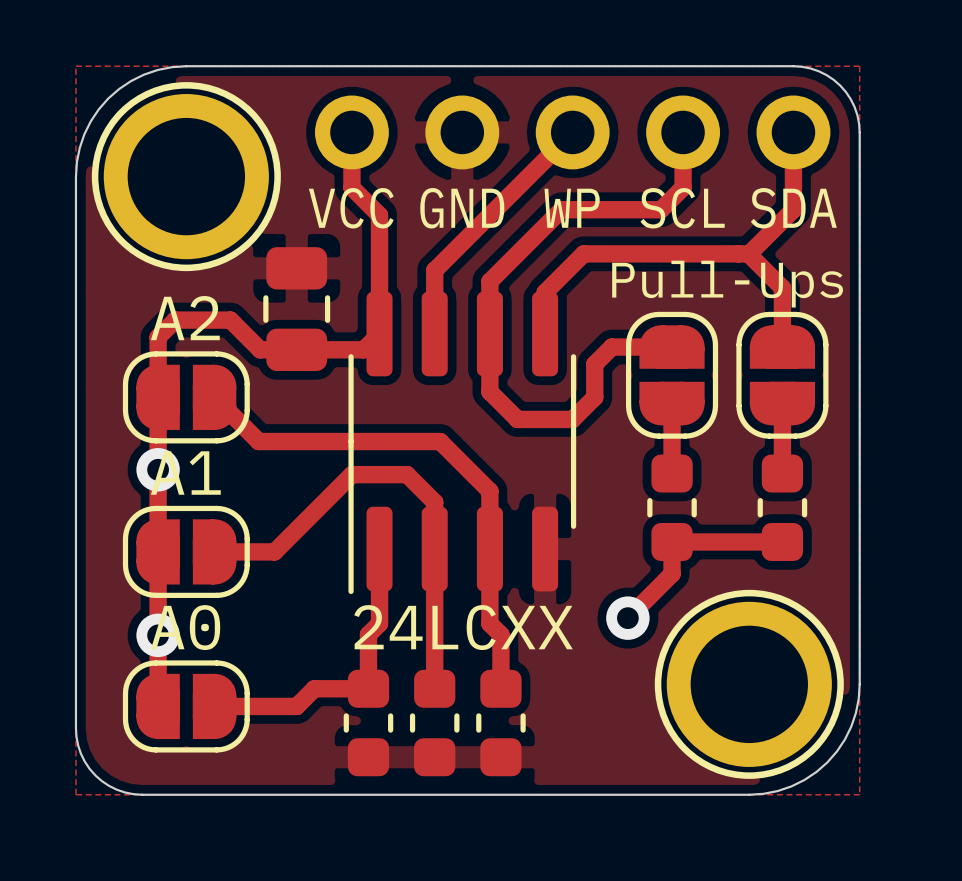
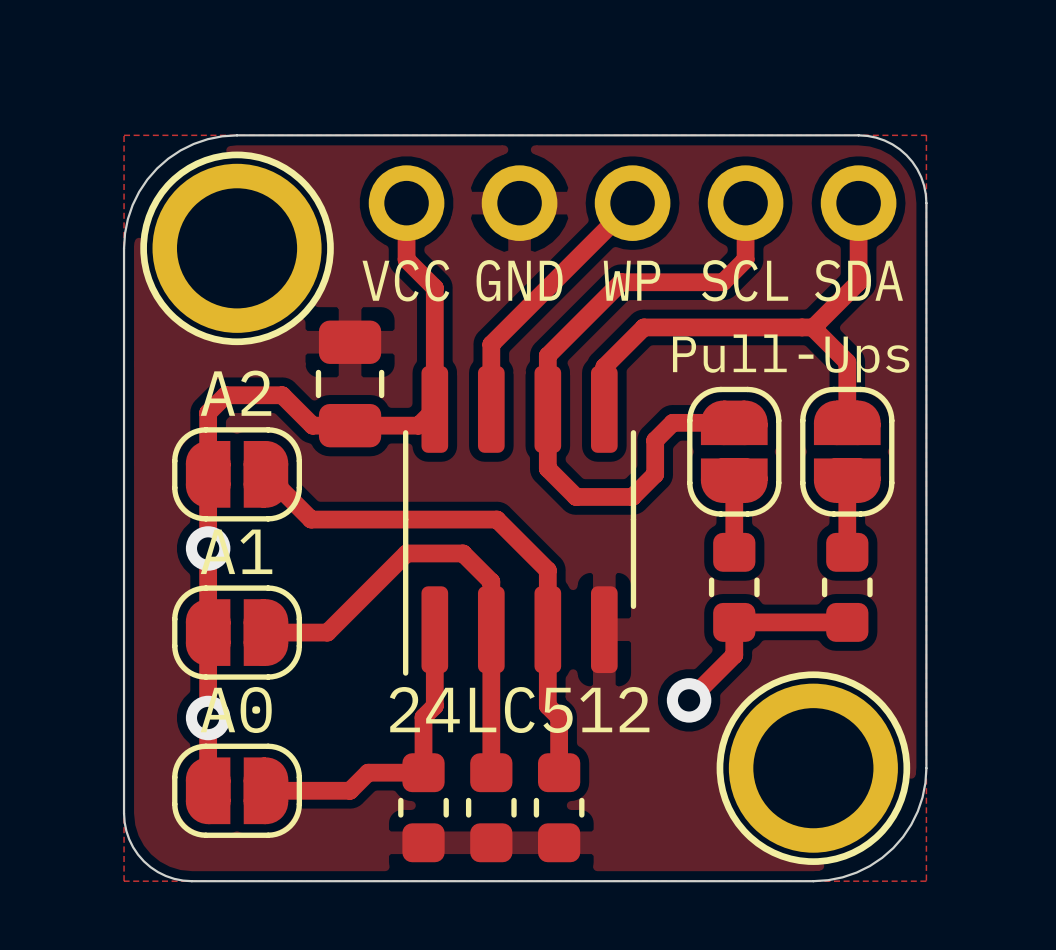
24LCXX name: 24LCXX (463, 627) -> 24LC512 (519, 710)

